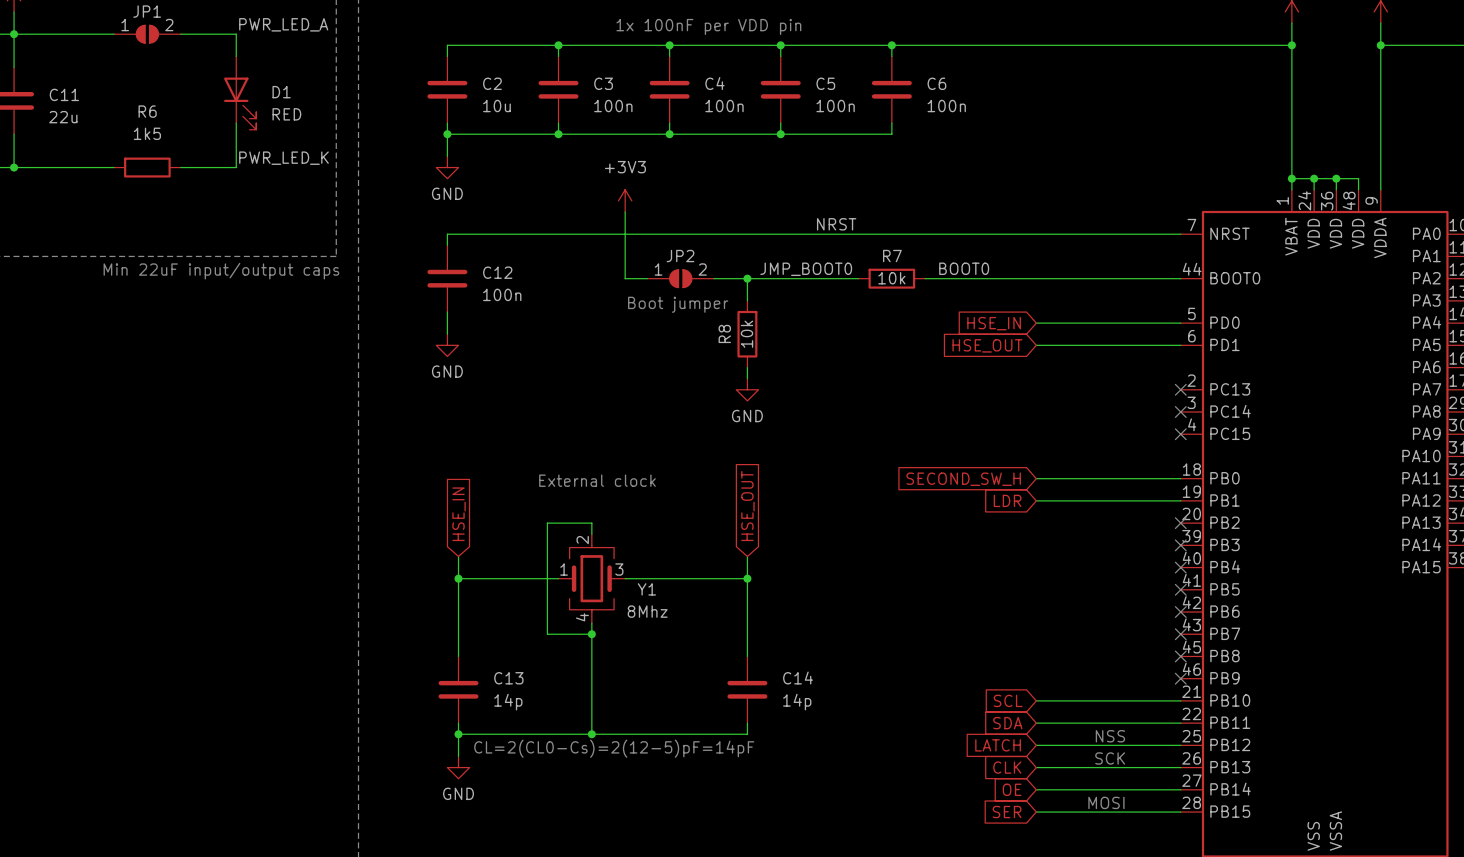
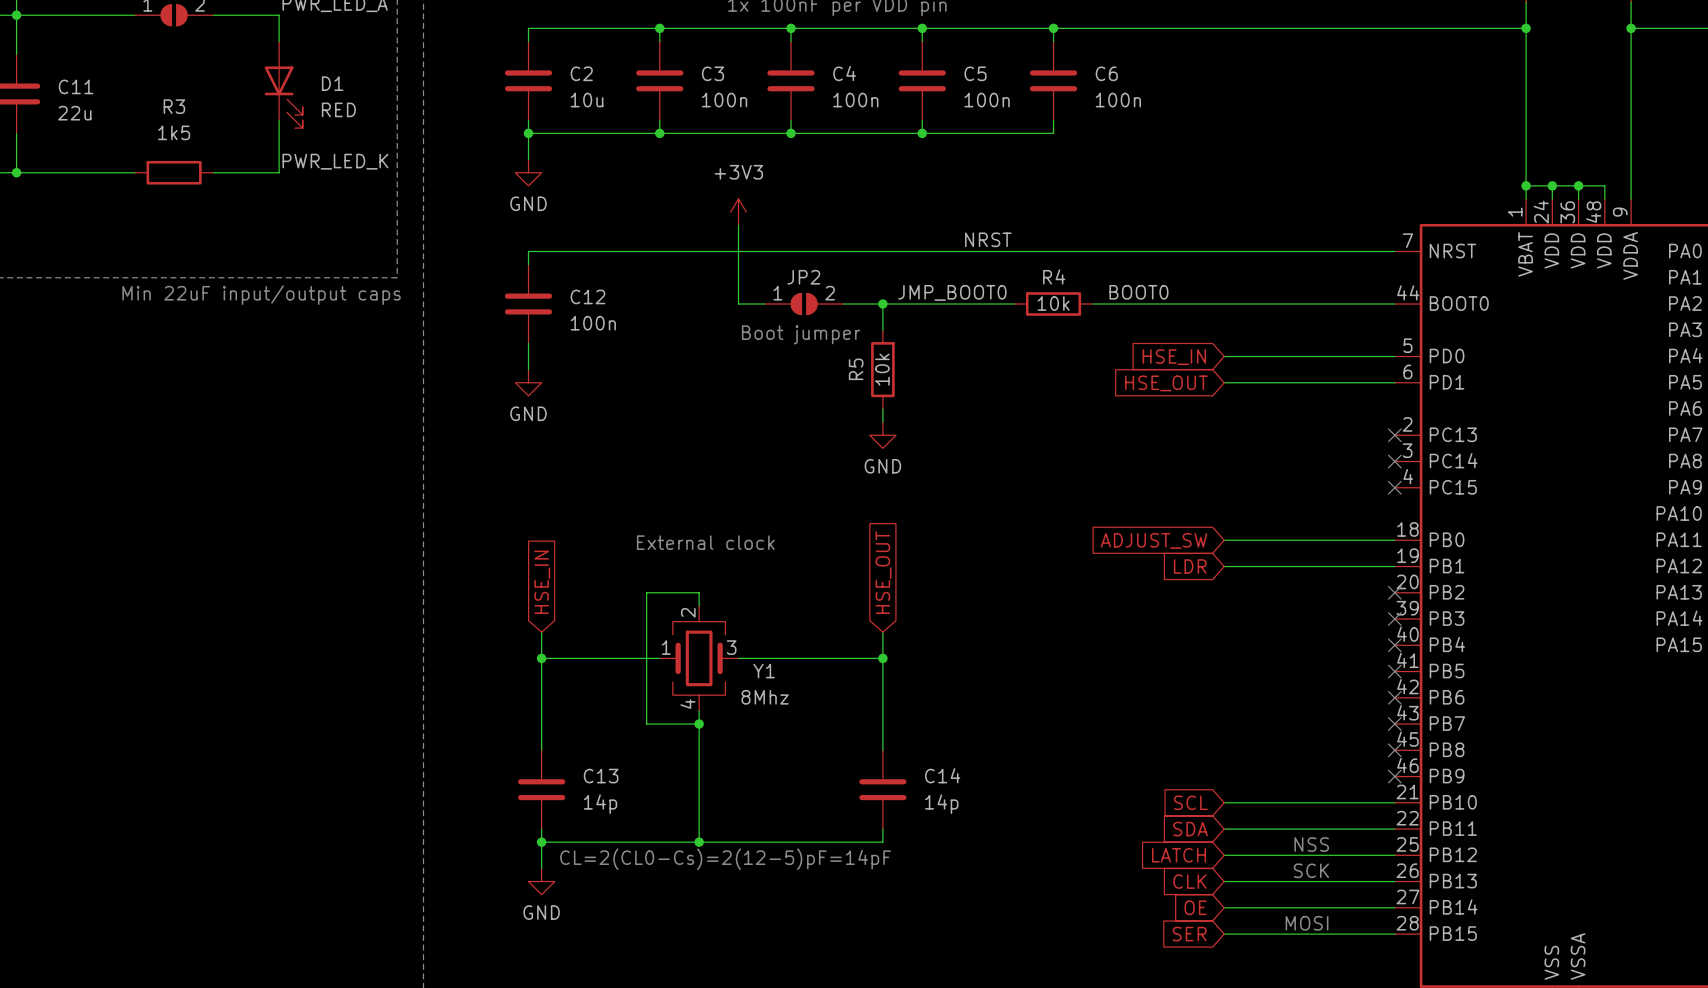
R6 name: R6 (147, 111) -> R3 (174, 106)
R7 name: R7 (892, 256) -> R4 (1054, 276)
R8 name: R8 (724, 333) -> R5 (856, 369)
global label: SECOND_SW_H (963, 479) -> ADJUST_SW (1153, 540)

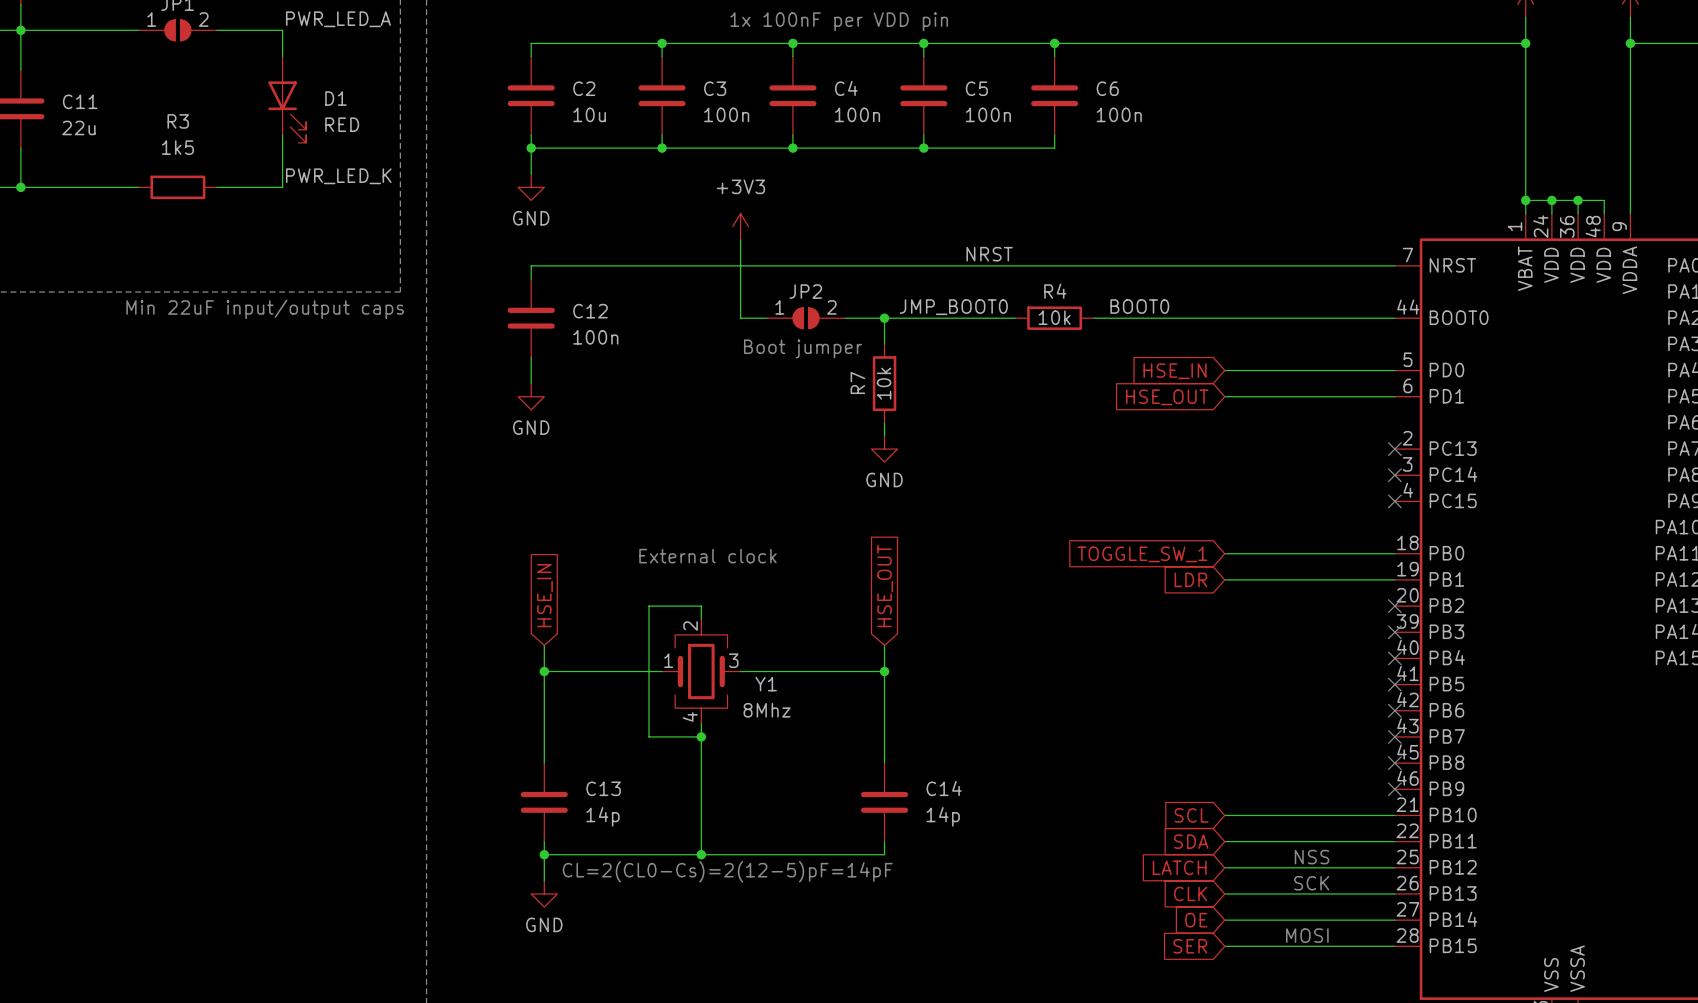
R5 name: R5 (856, 369) -> R7 (857, 383)
global label: ADJUST_SW (1153, 540) -> TOGGLE_SW_1 (1142, 554)

